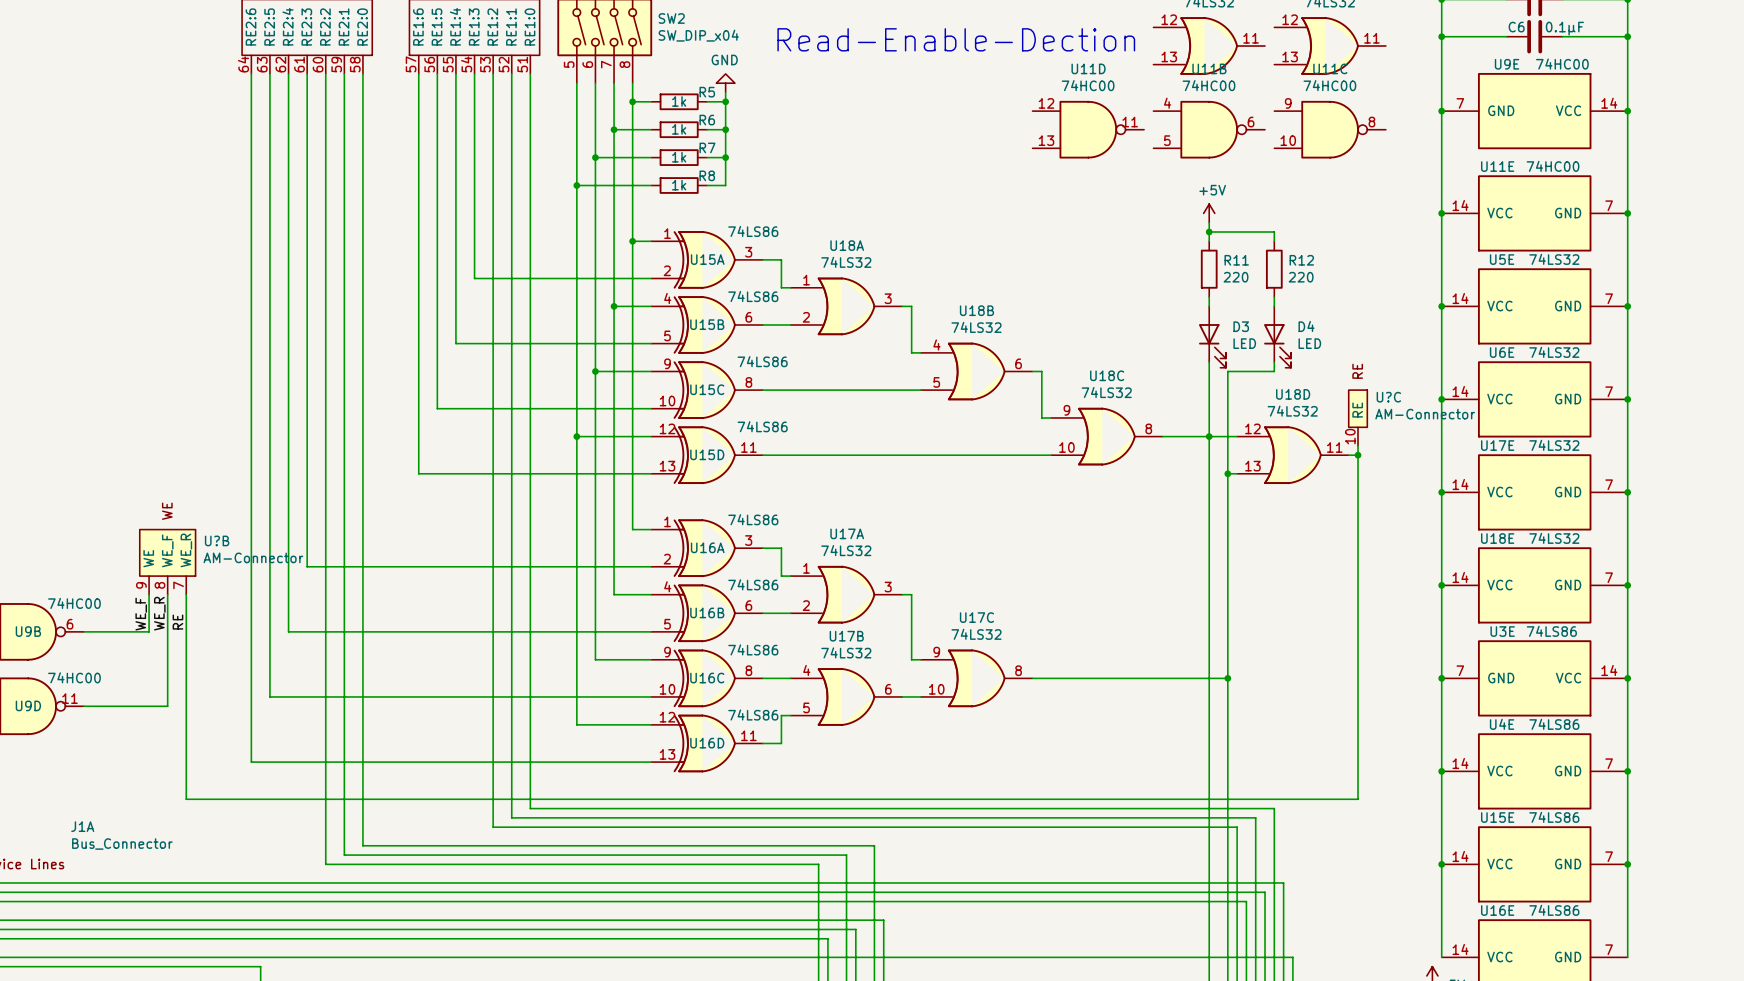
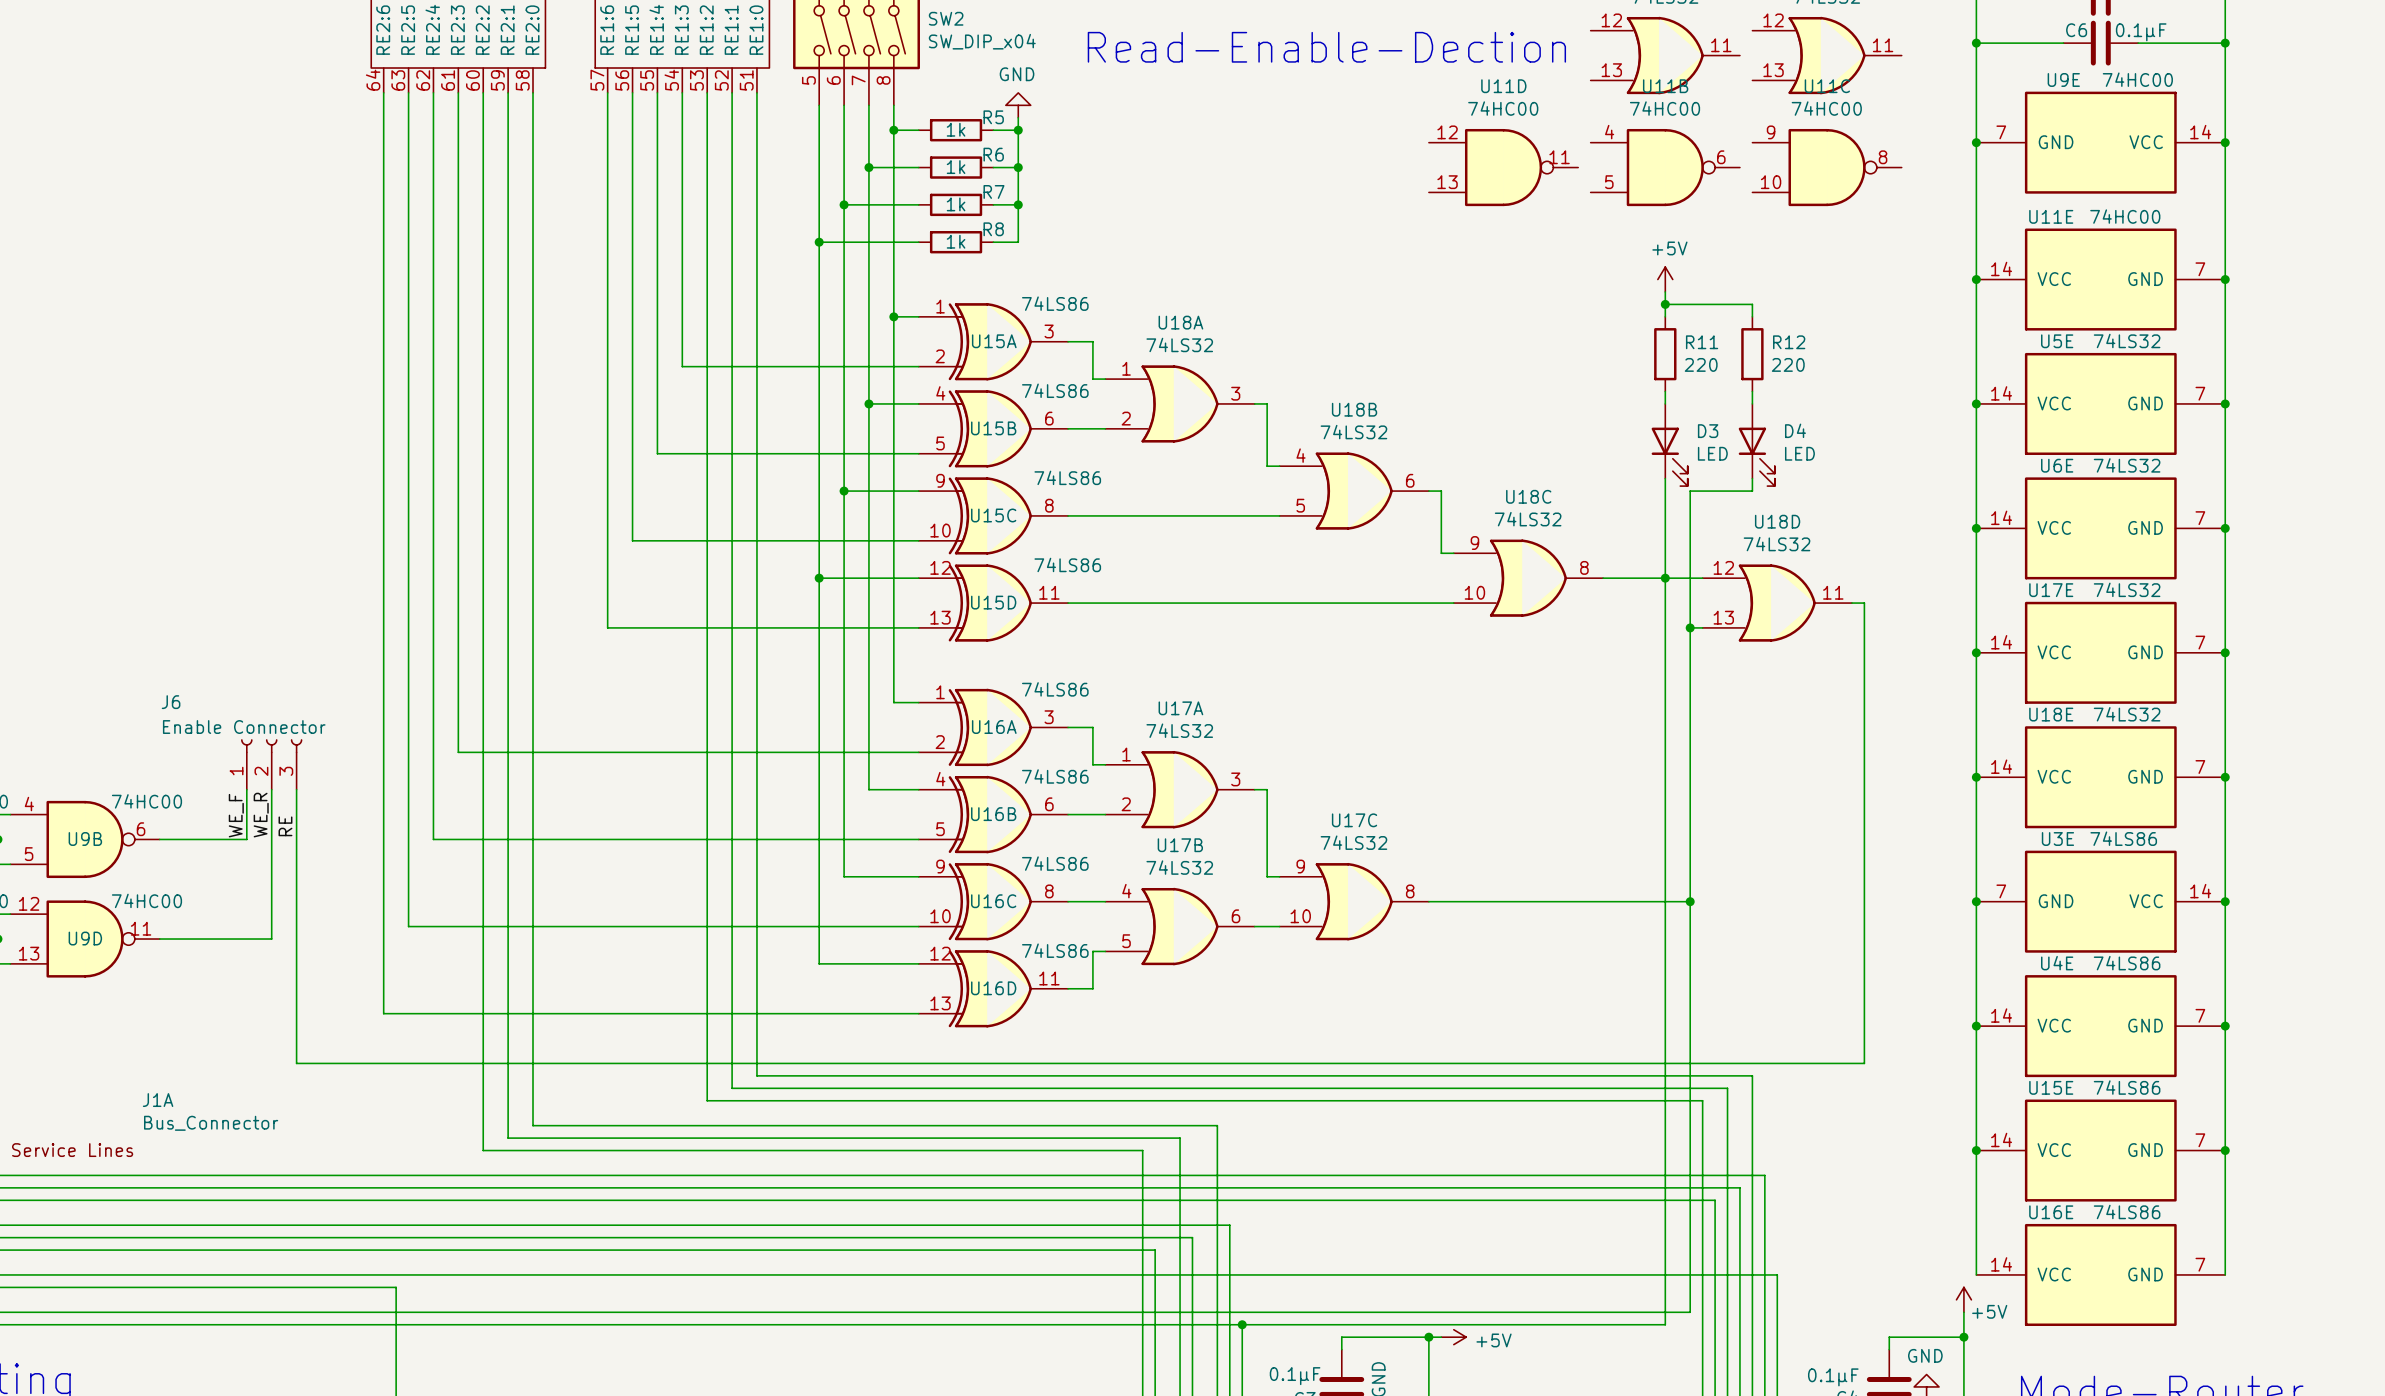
U?C: AM-Connector (1358, 417) -> none
wire: (1358, 445) (1358, 455) -> none
junction: (1358, 455) -> none
U?B: AM-Connector (167, 562) -> none
J6: none -> Enable Connector (271, 764)

